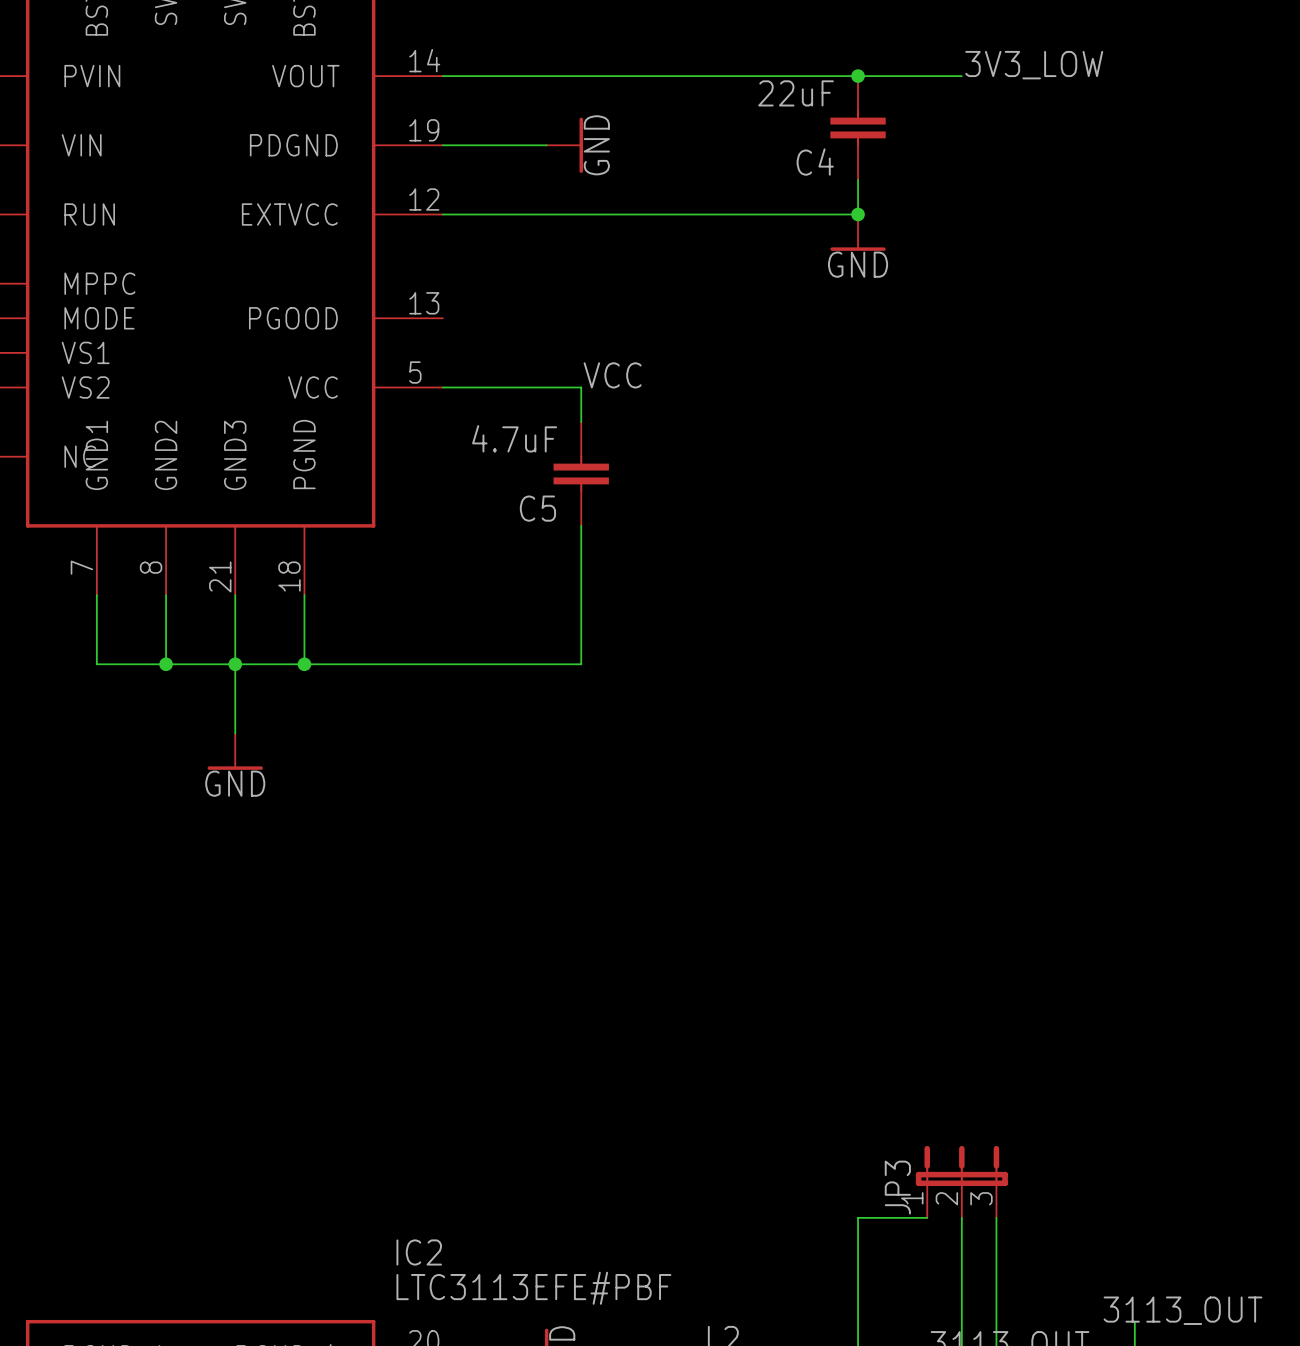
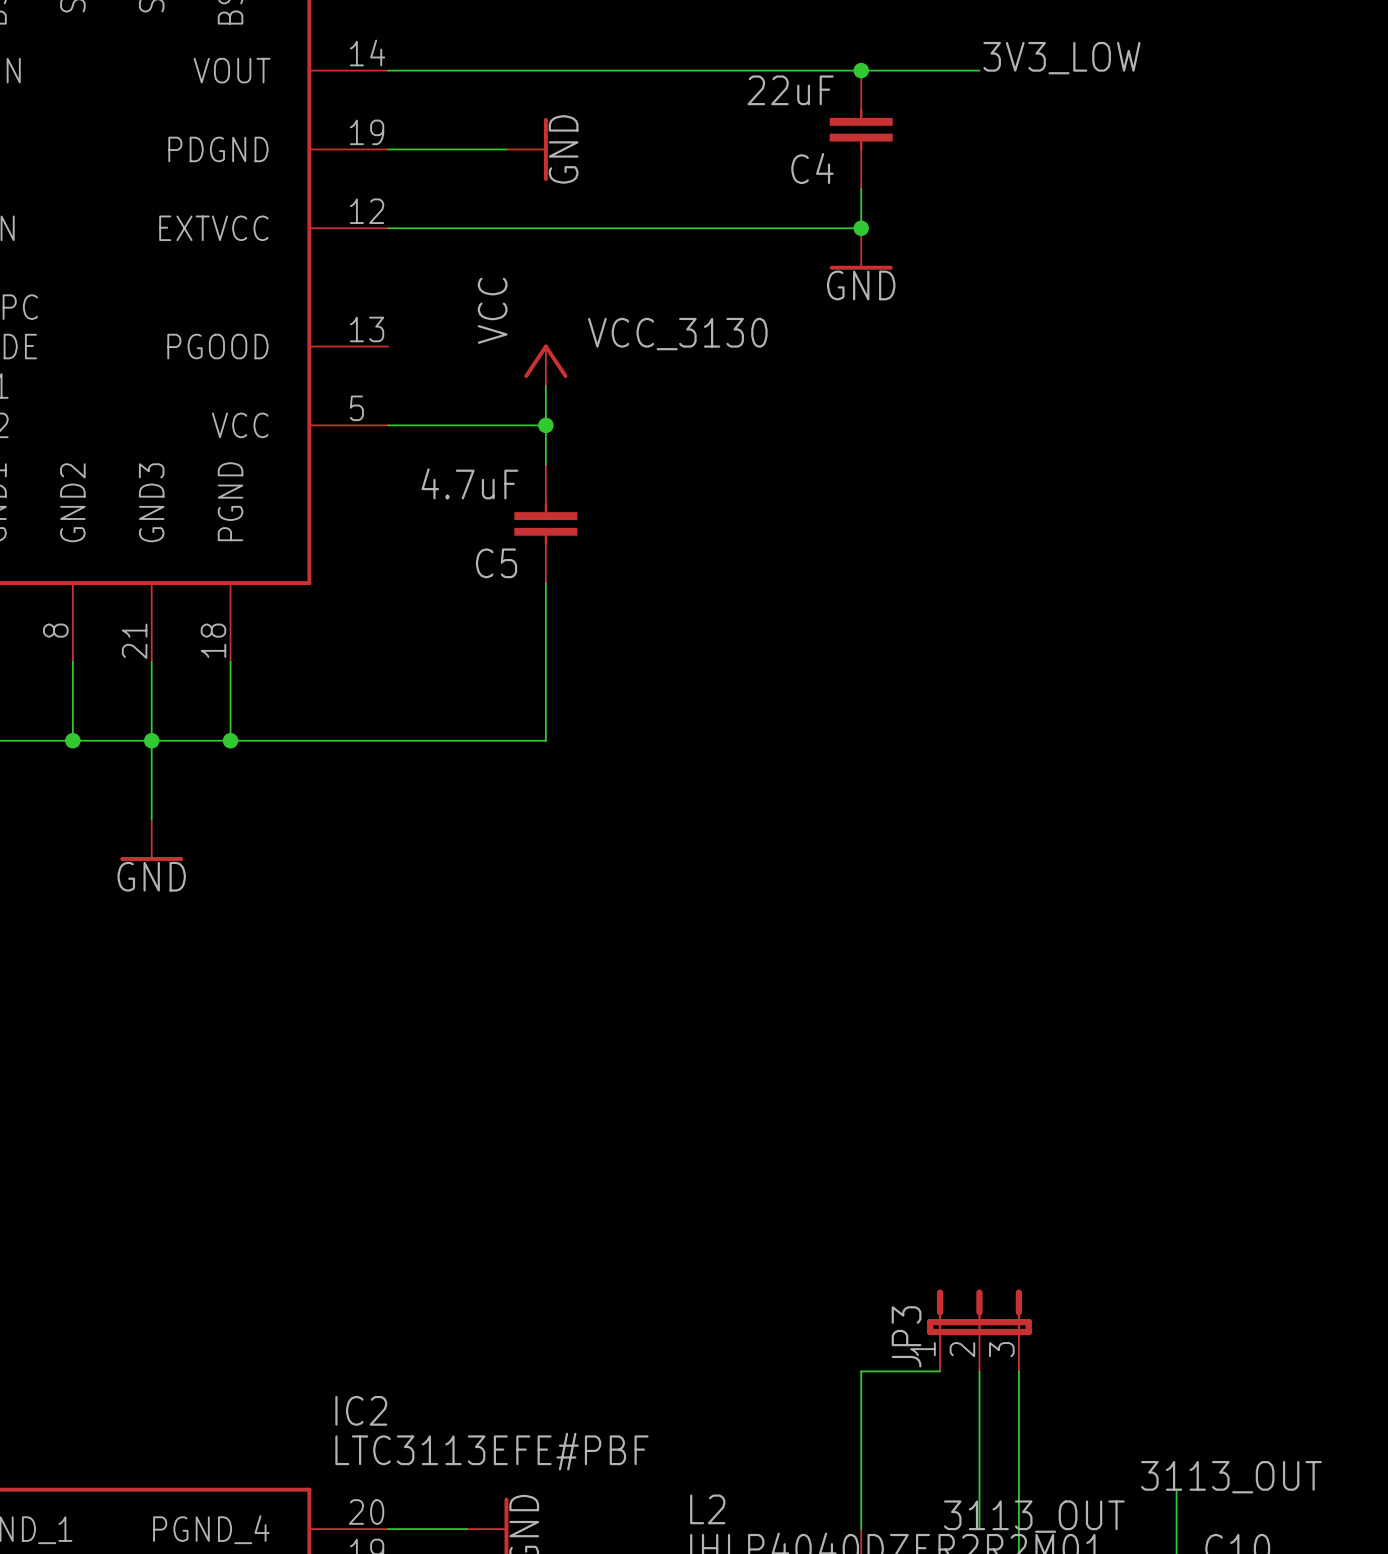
label: none -> VCC_3130 (677, 334)
power symbol: none -> VCC (545, 365)
wire: none -> (545, 385) (545, 425)
label: VCC (612, 375) -> none
junction: none -> (545, 425)

